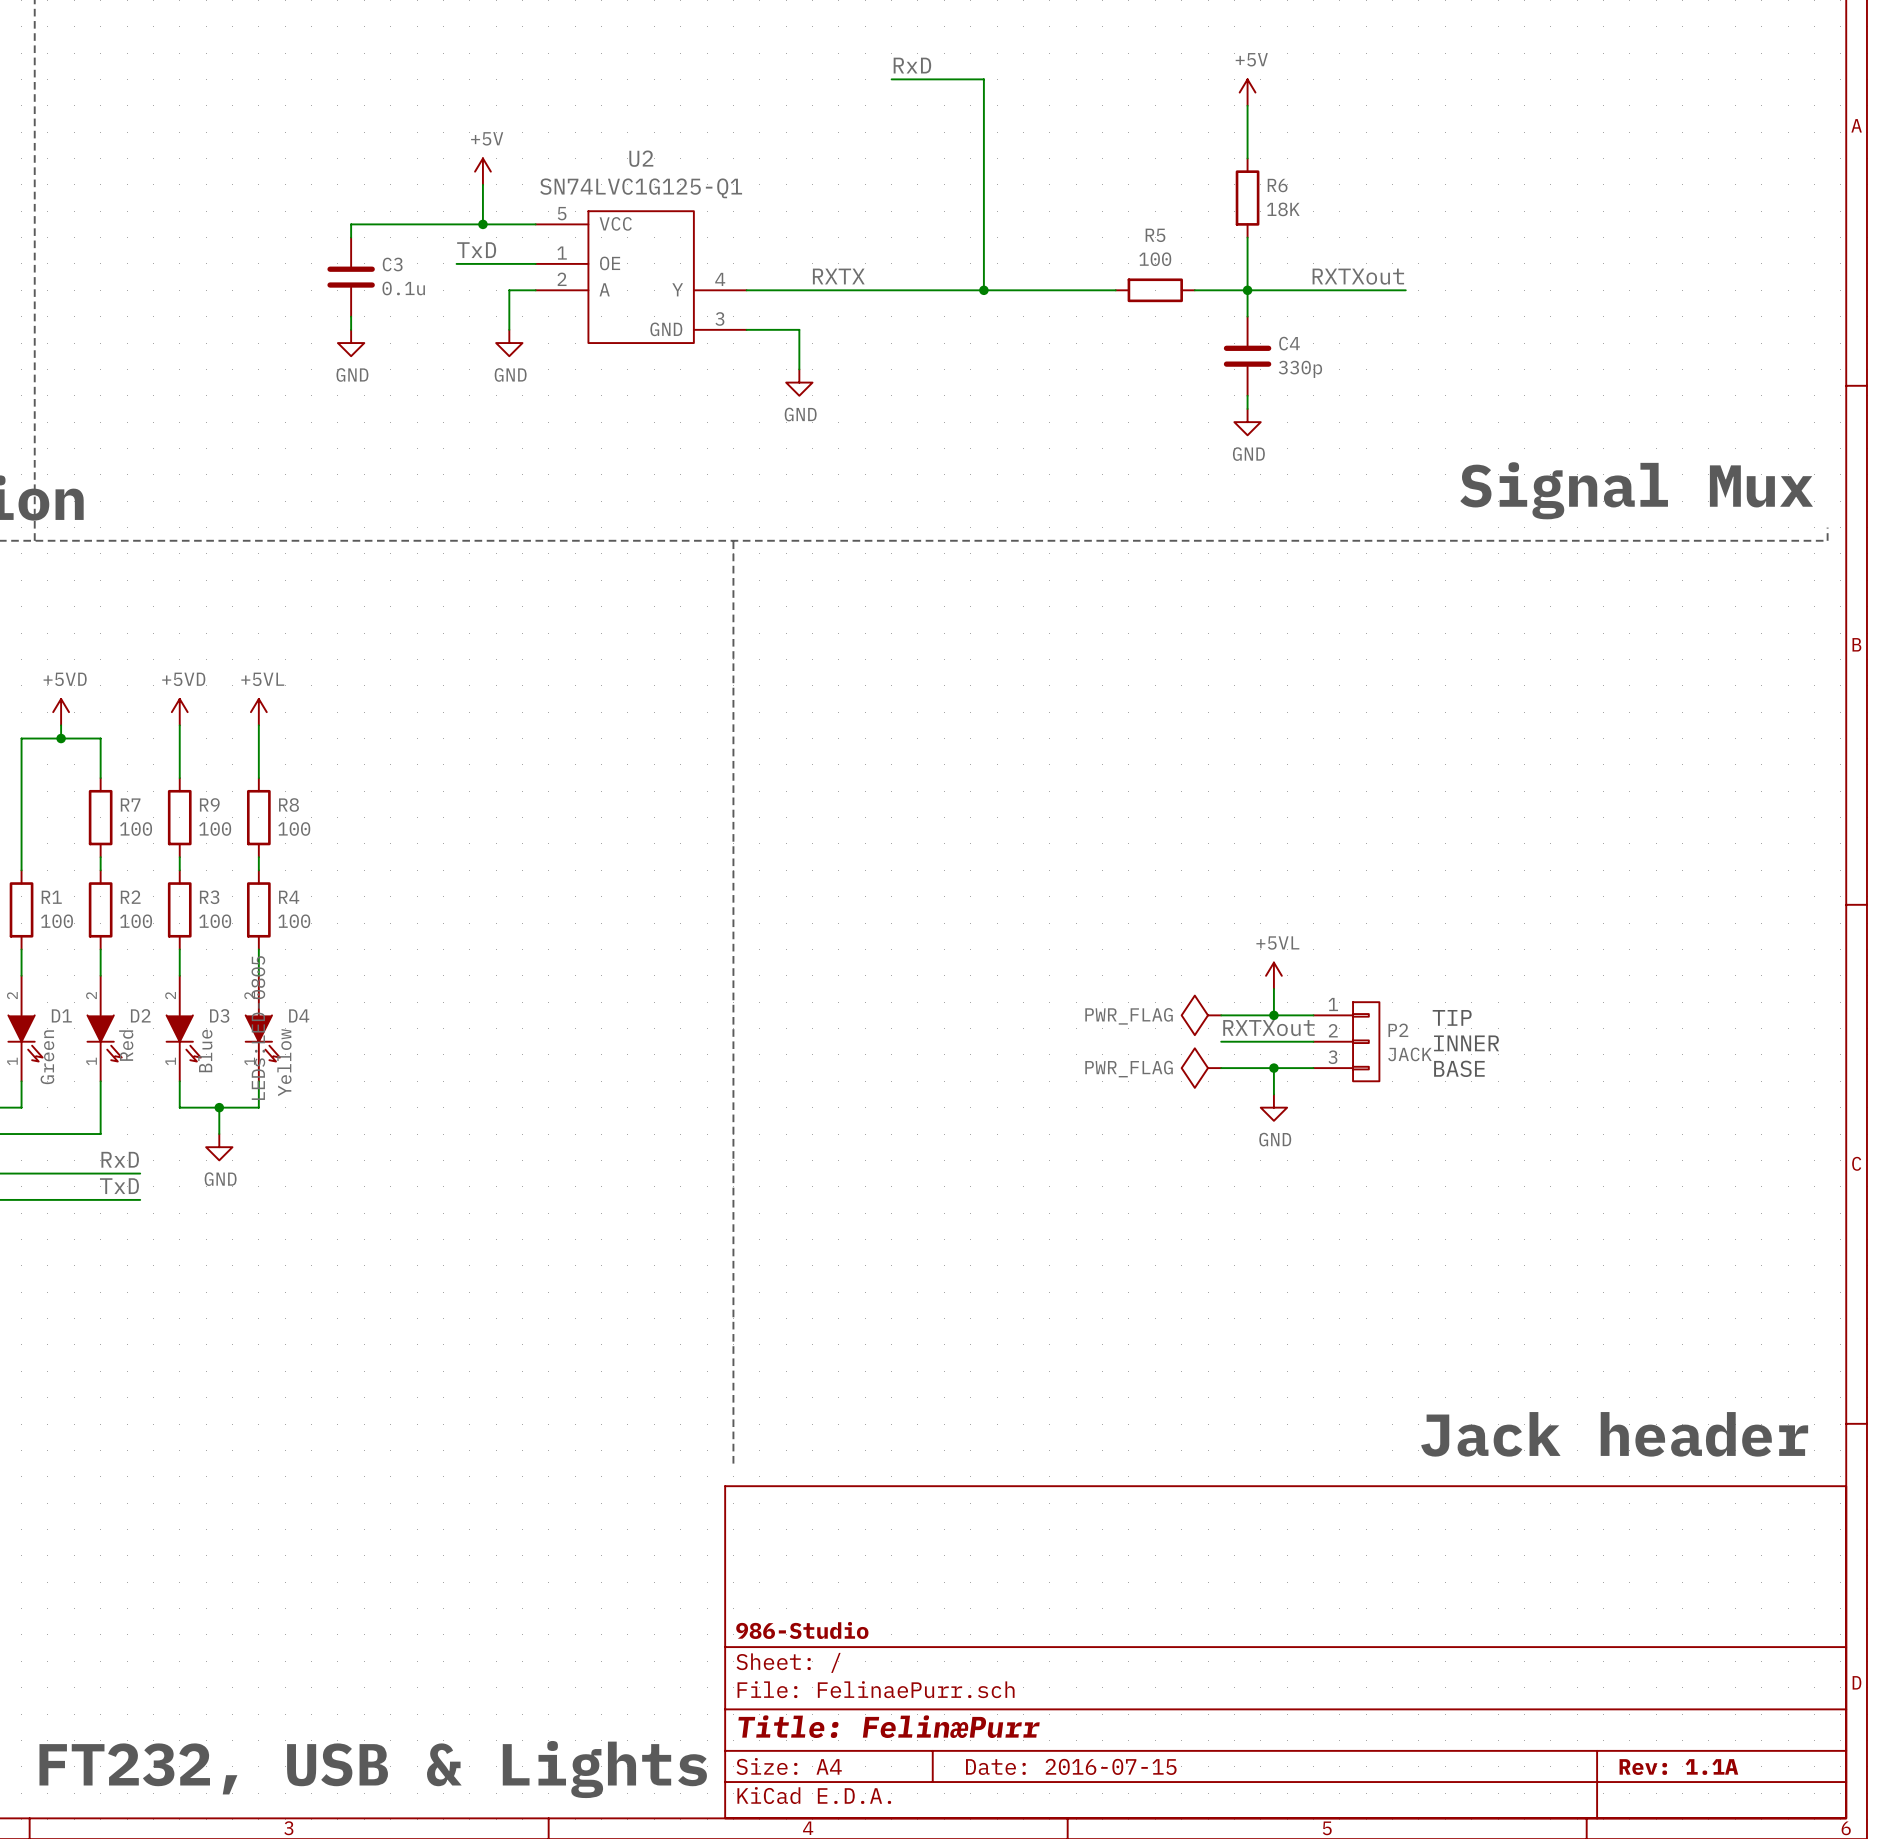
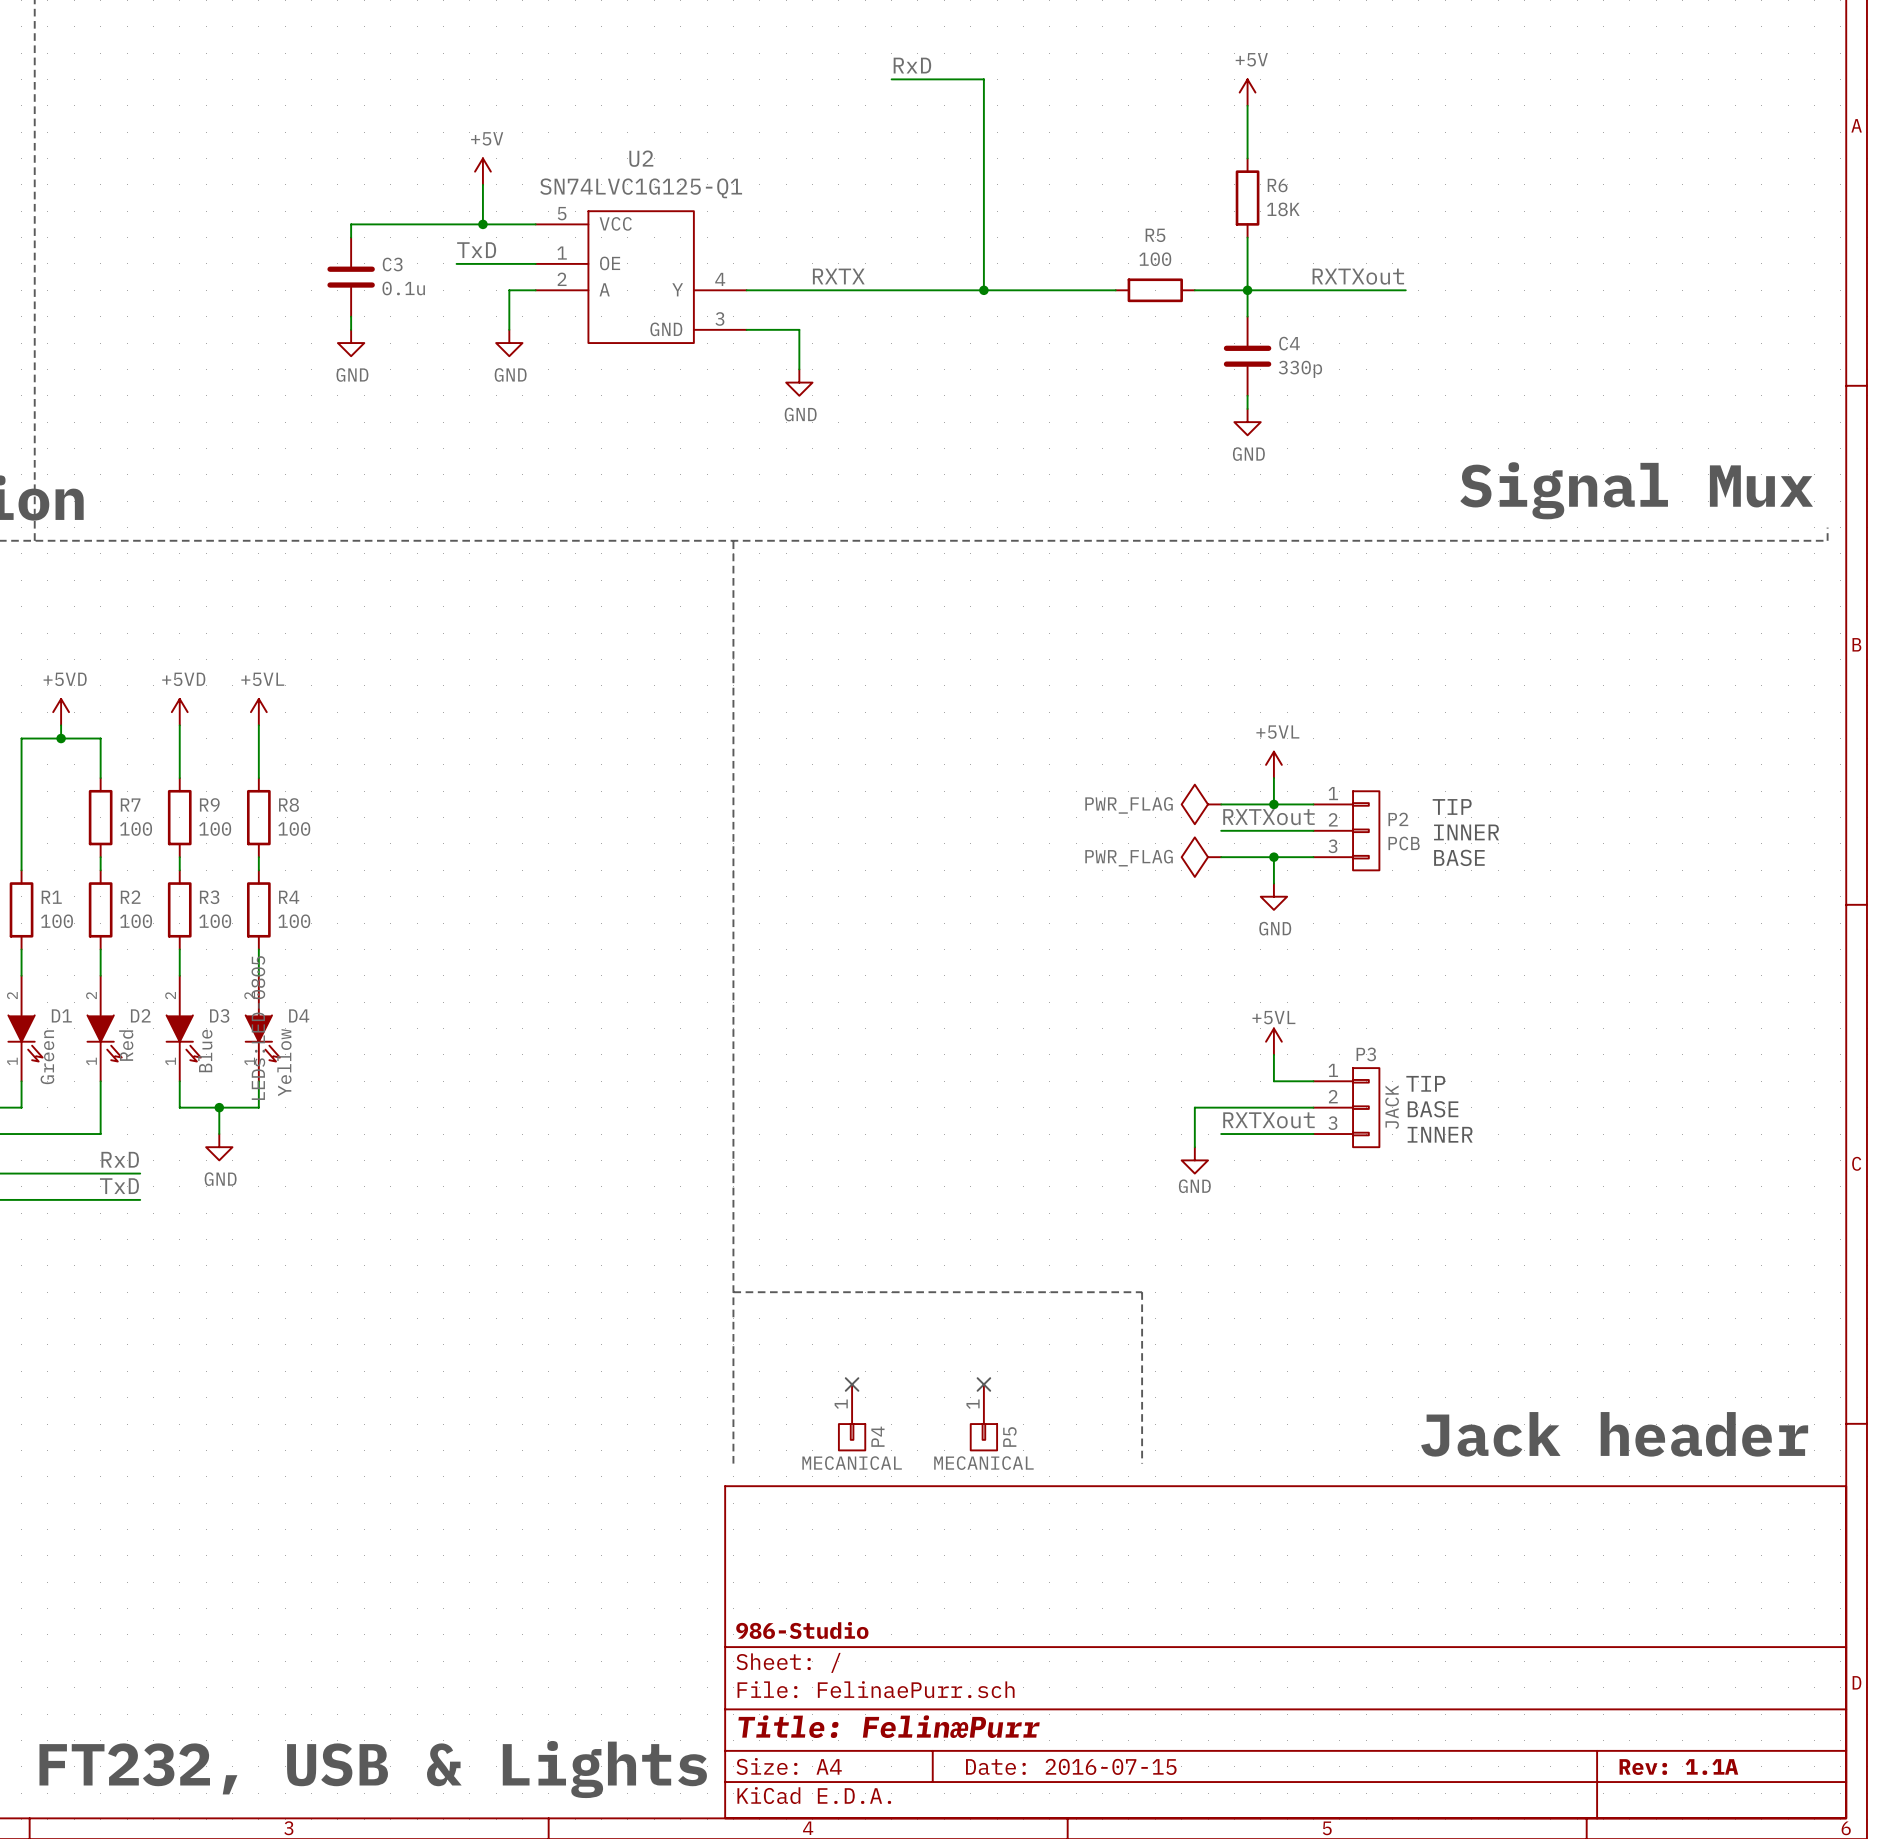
power symbol: none -> +5VL (1273, 764)
power symbol: none -> PWR_FLAG (1201, 804)
junction: none -> (1273, 804)
text: none -> TIP (1452, 806)
label: none -> RXTXout (1268, 817)
text: none -> INNER (1466, 832)
power symbol: none -> PWR_FLAG (1201, 857)
wire: none -> (1273, 857) (1273, 883)
junction: none -> (1273, 857)
text: none -> BASE (1459, 857)
power symbol: none -> GND (1273, 896)
power symbol text position: +5VL (1277, 943) -> +5VL (1273, 1017)
power symbol position: +5VL (1273, 975) -> +5VL (1273, 1041)
wire: (1273, 989) (1273, 1015) -> (1273, 778) (1273, 804)
power symbol: PWR_FLAG (1201, 1015) -> none
wire: (1221, 1015) (1313, 1015) -> (1221, 804) (1313, 804)
junction: (1273, 1015) -> none
text position: TIP (1452, 1017) -> TIP (1425, 1083)
label position: RXTXout (1268, 1028) -> RXTXout (1268, 1120)
wire: (1221, 1041) (1313, 1041) -> (1221, 830) (1313, 830)
P2 position: (1346, 1041) -> (1346, 830)
text position: INNER (1466, 1043) -> INNER (1440, 1134)
wire: none -> (1273, 1054) (1273, 1068)
P2 value: JACK (1409, 1054) -> PCB (1404, 843)
power symbol: PWR_FLAG (1201, 1068) -> none
wire: (1221, 1068) (1313, 1068) -> (1221, 857) (1313, 857)
junction: (1273, 1068) -> none
text position: BASE (1459, 1068) -> BASE (1433, 1109)
wire: (1273, 1081) (1273, 1094) -> (1273, 1081) (1313, 1081)
power symbol position: GND (1273, 1107) -> GND (1194, 1160)
wire: none -> (1313, 1107) (1194, 1107) (1194, 1147)
P3: none -> JACK (1346, 1107)
wire: none -> (1221, 1134) (1313, 1134)
power symbol text position: GND (1275, 1139) -> GND (1194, 1186)
line: none -> (733, 1292) (1142, 1292) (1142, 1463)
no-connect mark: none -> (852, 1384)
no-connect mark: none -> (983, 1384)
P4: none -> MECANICAL (852, 1417)
P5: none -> MECANICAL (983, 1417)

